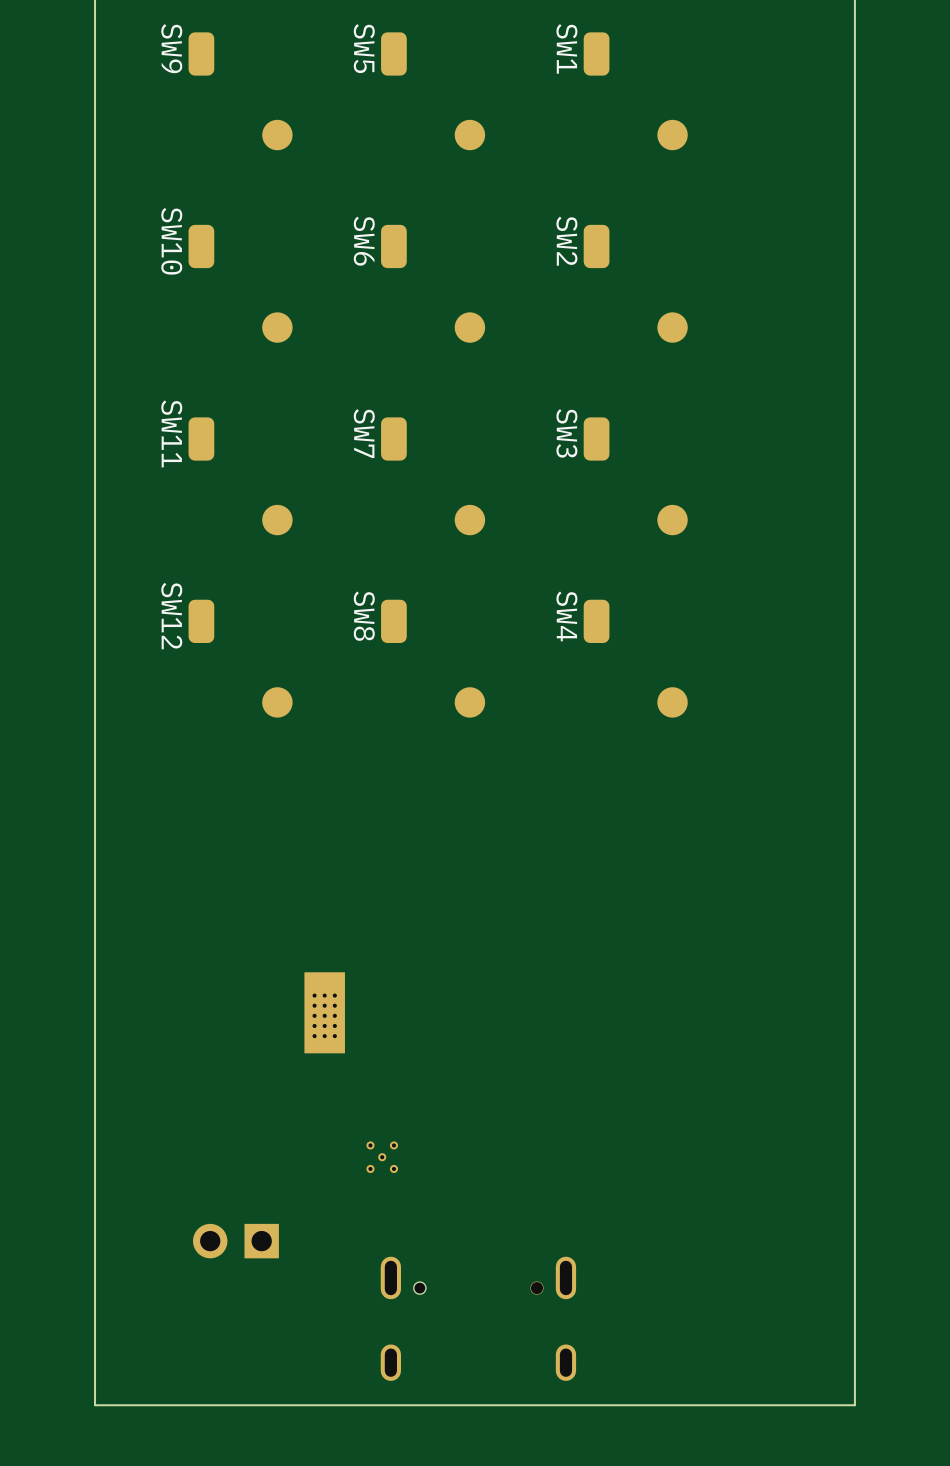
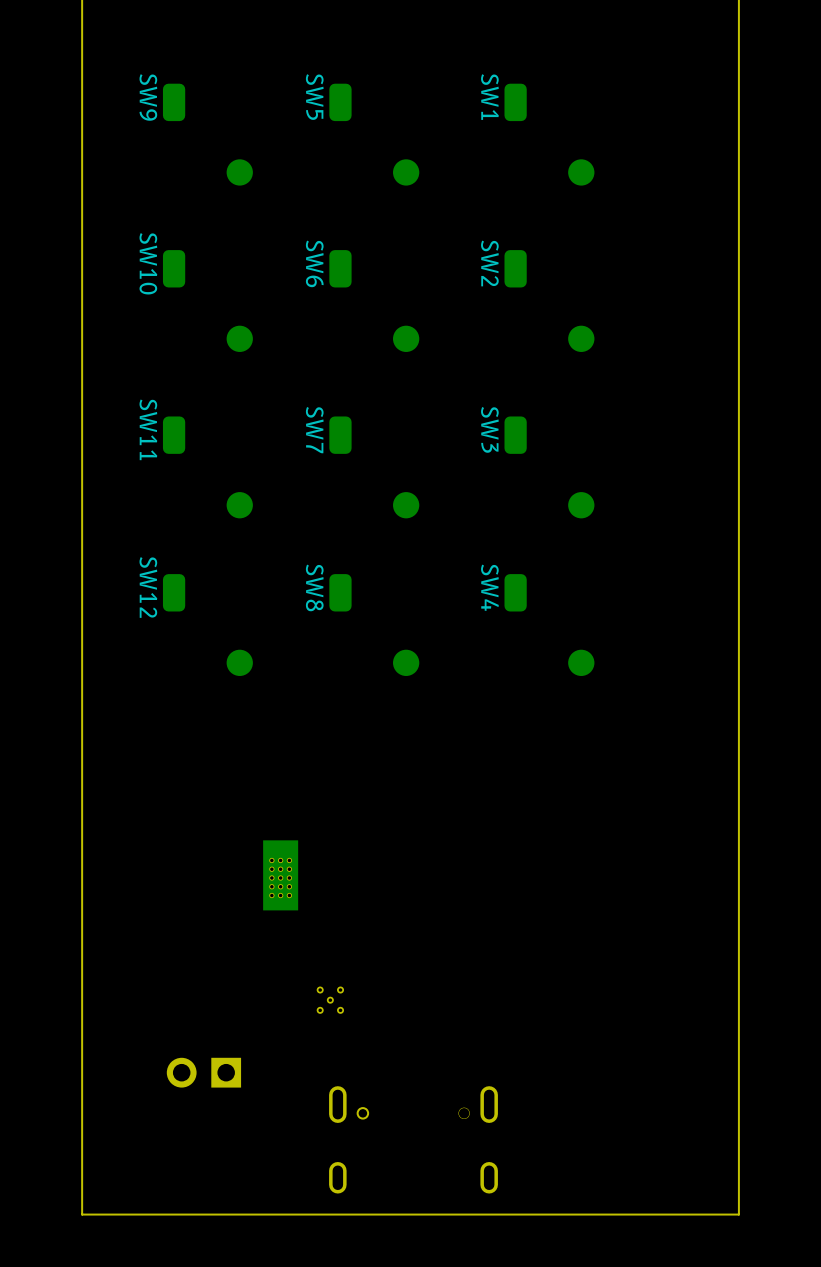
SW9 position: (240, 91) -> (207, 134)
SW5 position: (433, 91) -> (374, 134)
SW1 position: (635, 91) -> (549, 134)
SW10 position: (240, 283) -> (207, 301)
SW6 position: (433, 283) -> (374, 301)
SW2 position: (635, 283) -> (549, 301)
SW11 position: (240, 476) -> (207, 467)
SW7 position: (433, 476) -> (374, 467)
SW3 position: (635, 476) -> (549, 467)
SW12 position: (240, 658) -> (207, 625)
SW8 position: (433, 658) -> (374, 625)
SW4 position: (635, 658) -> (549, 625)

